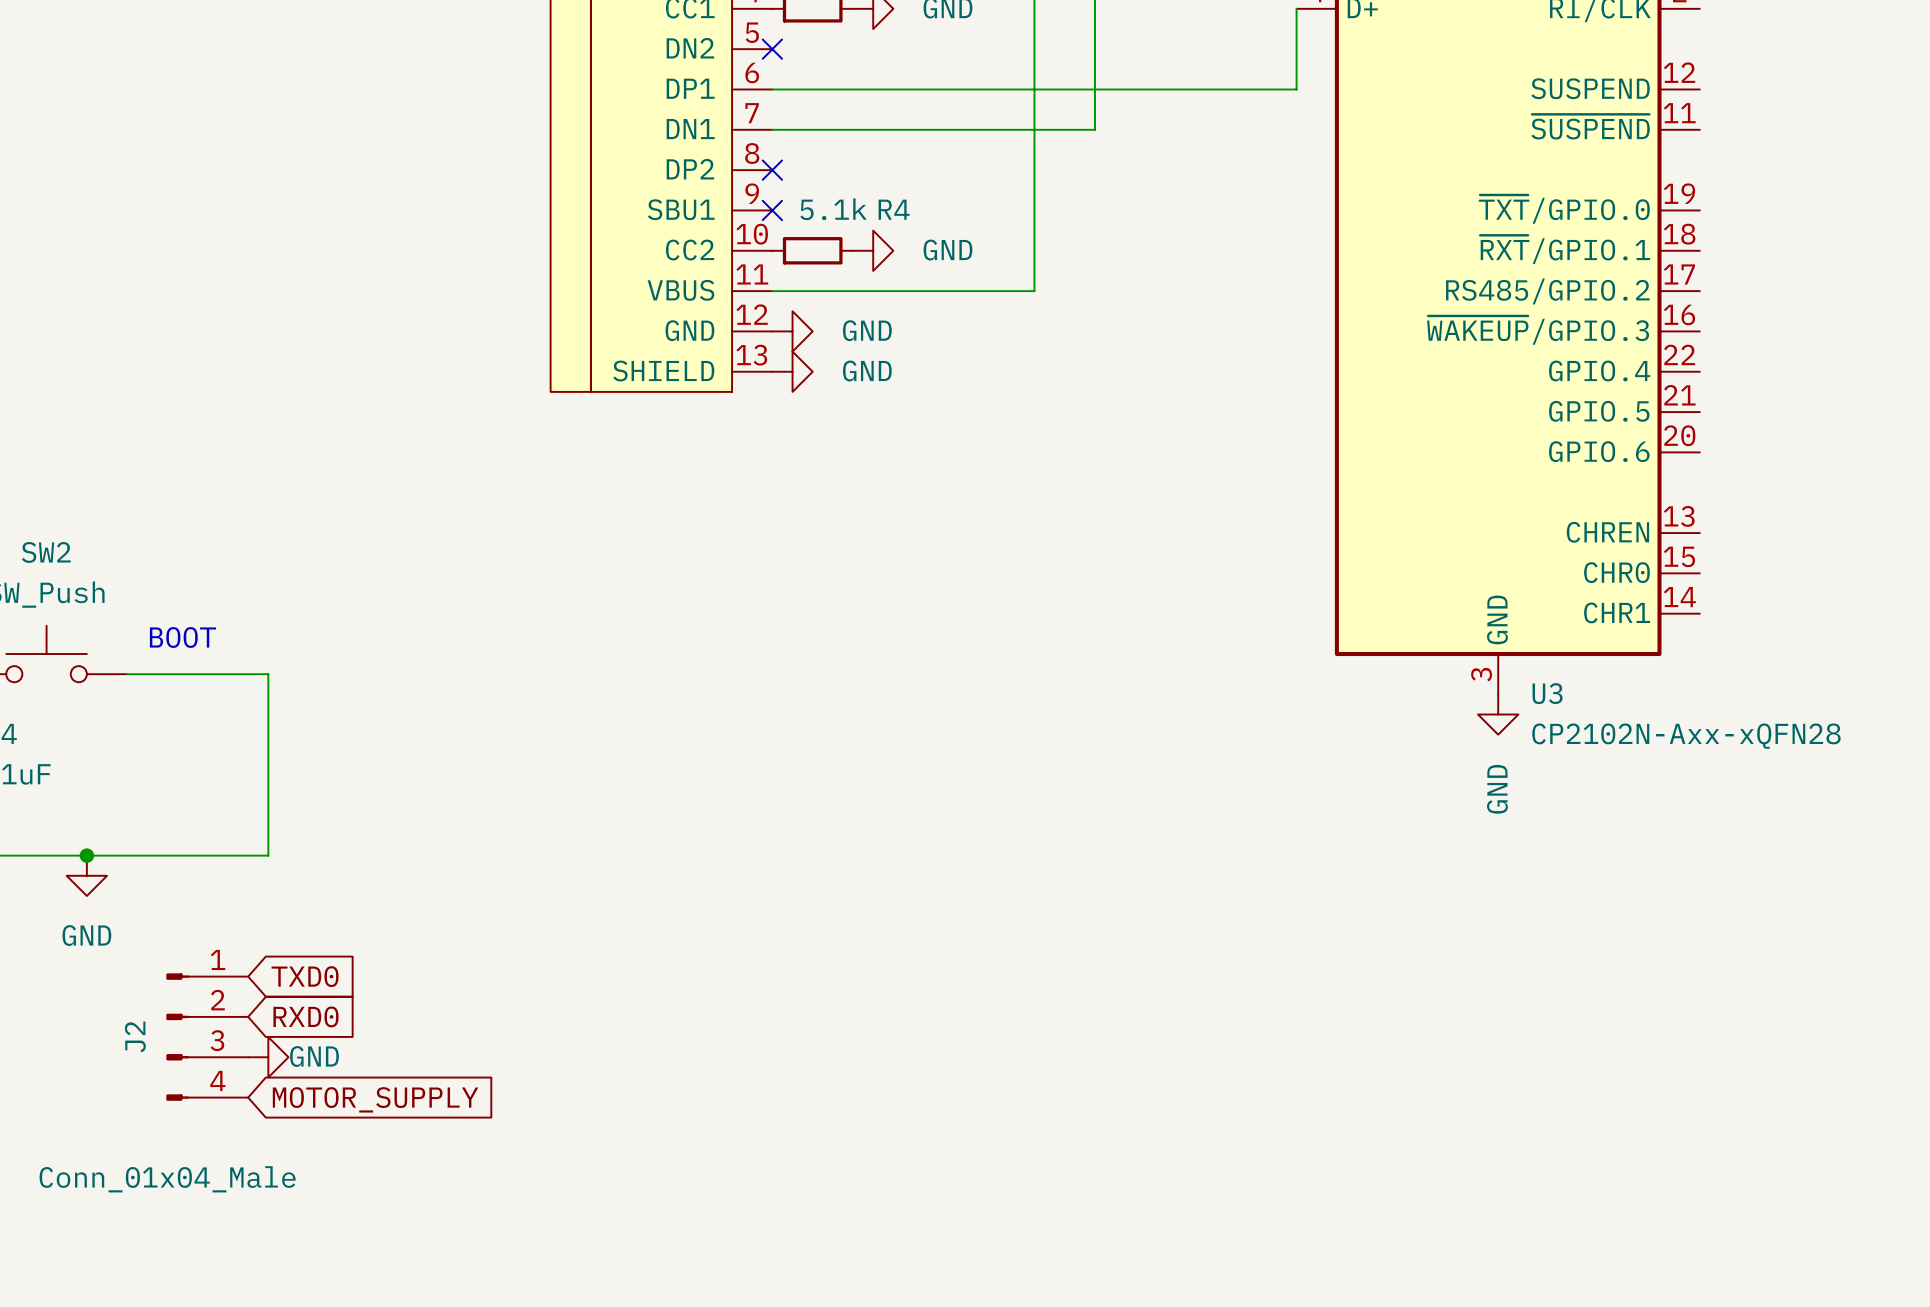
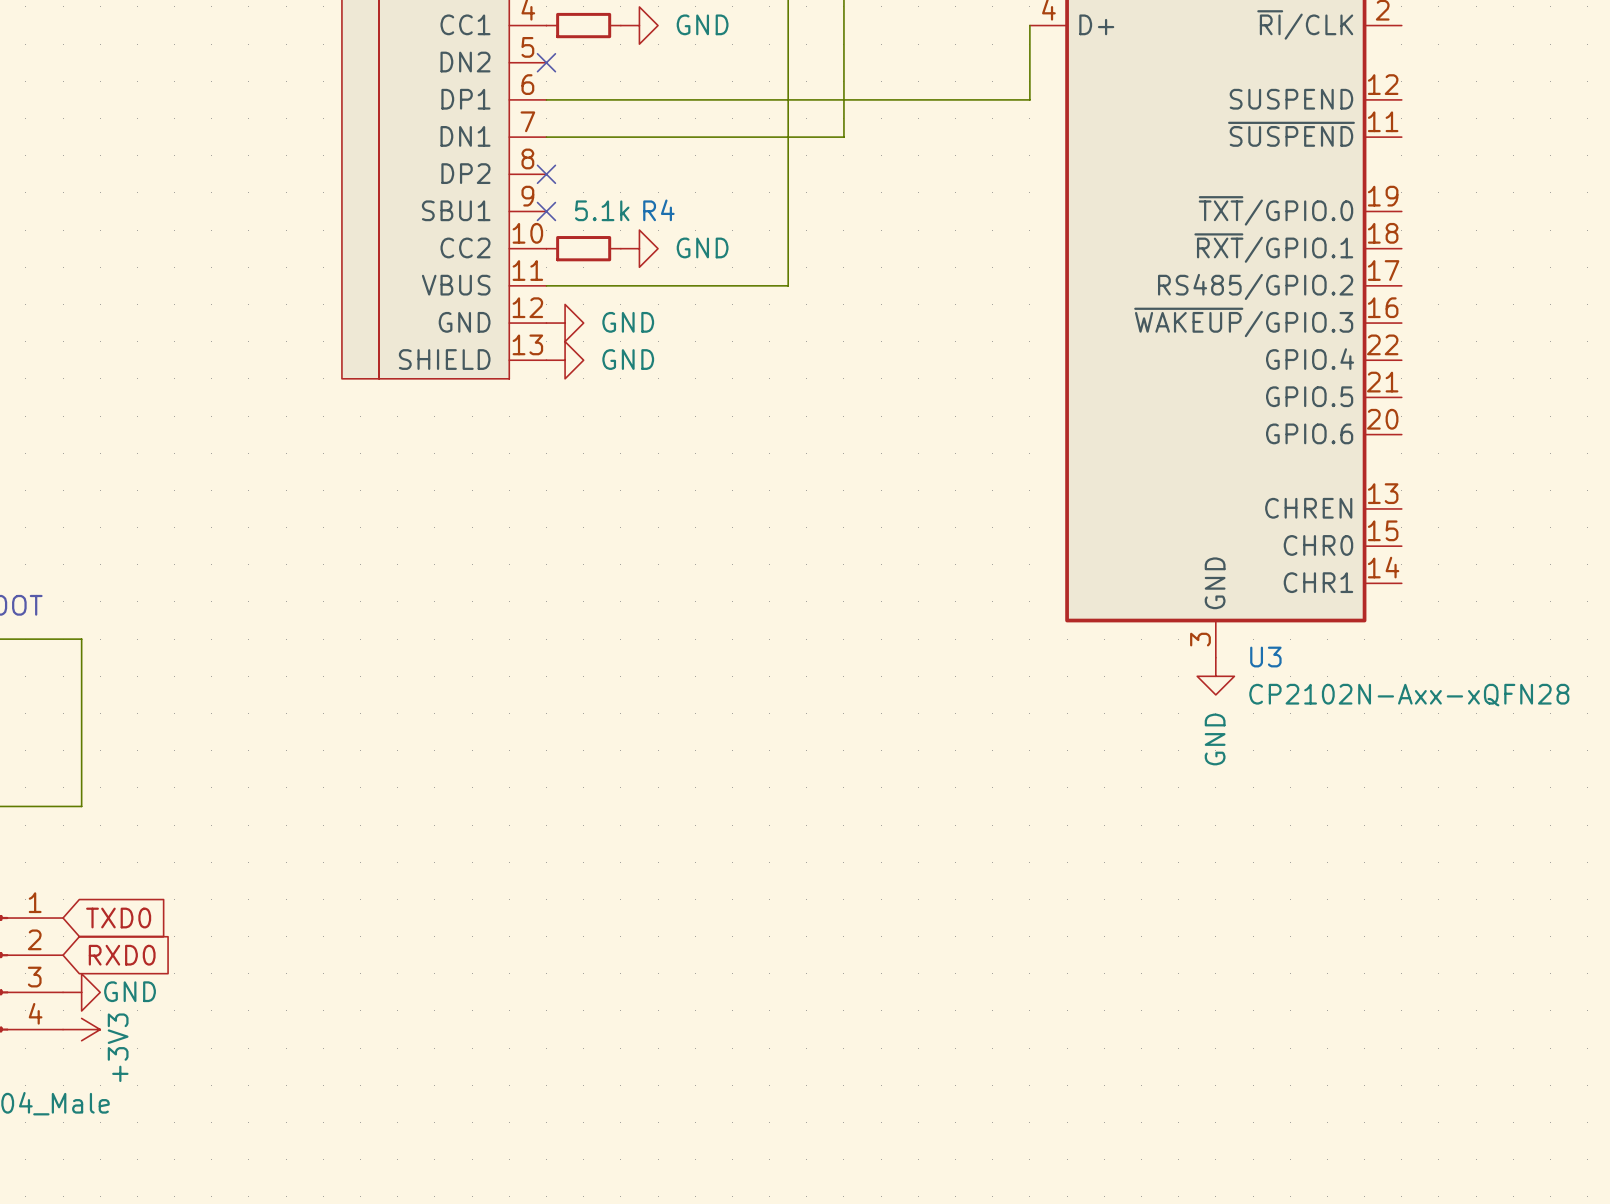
power symbol: none -> +3V3 (81, 1029)
global label: MOTOR_SUPPLY (375, 1099) -> none

